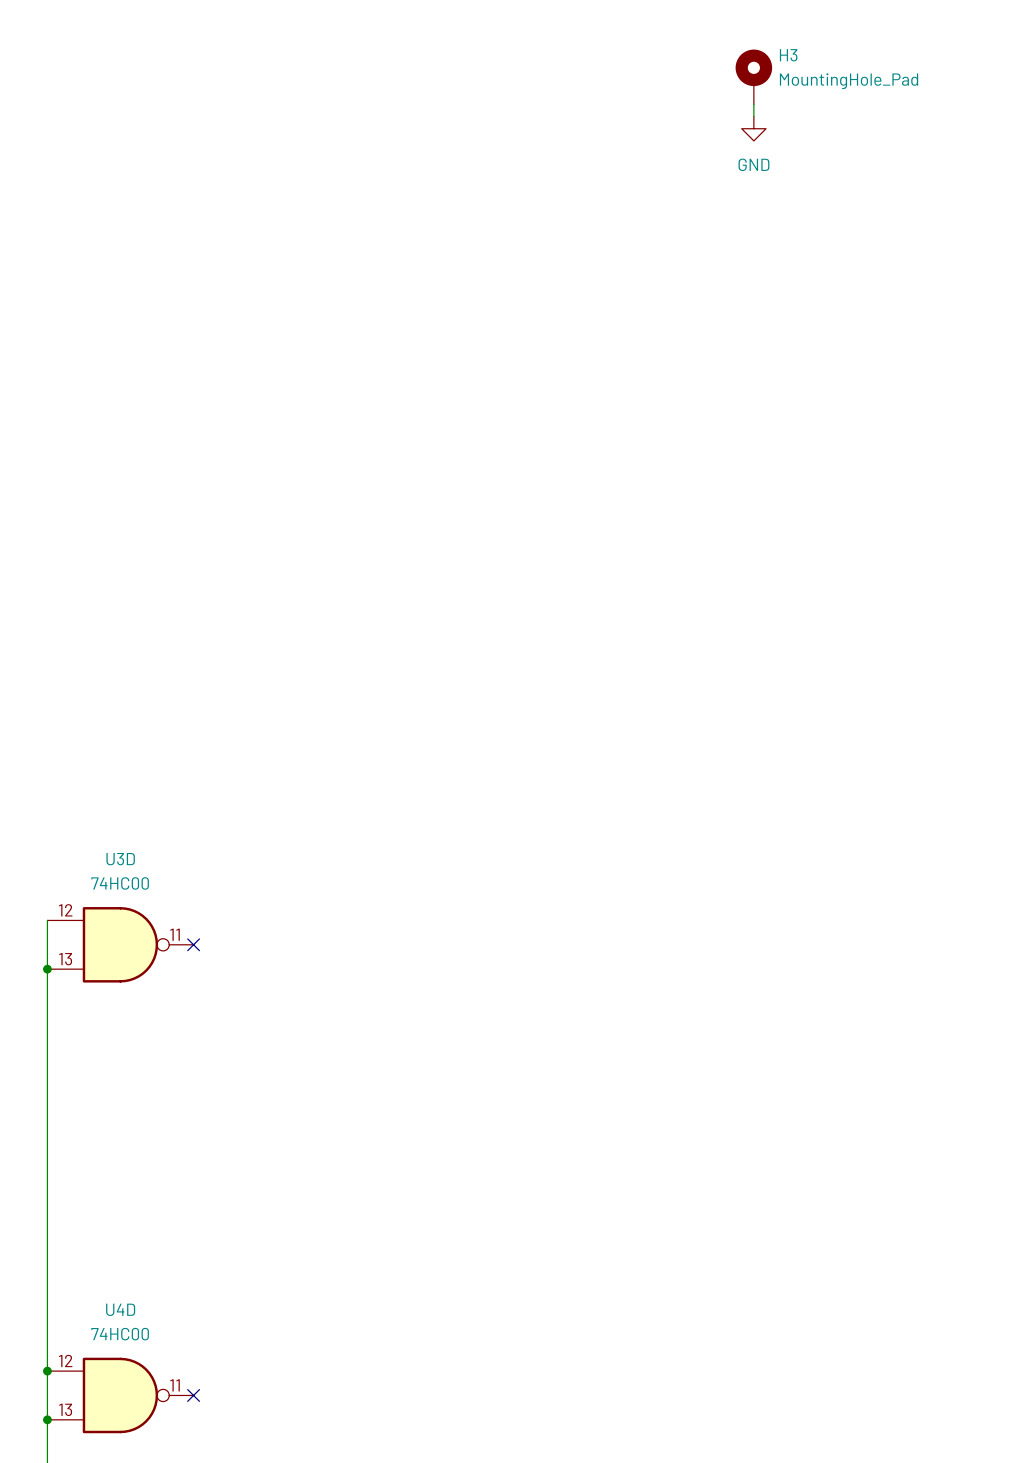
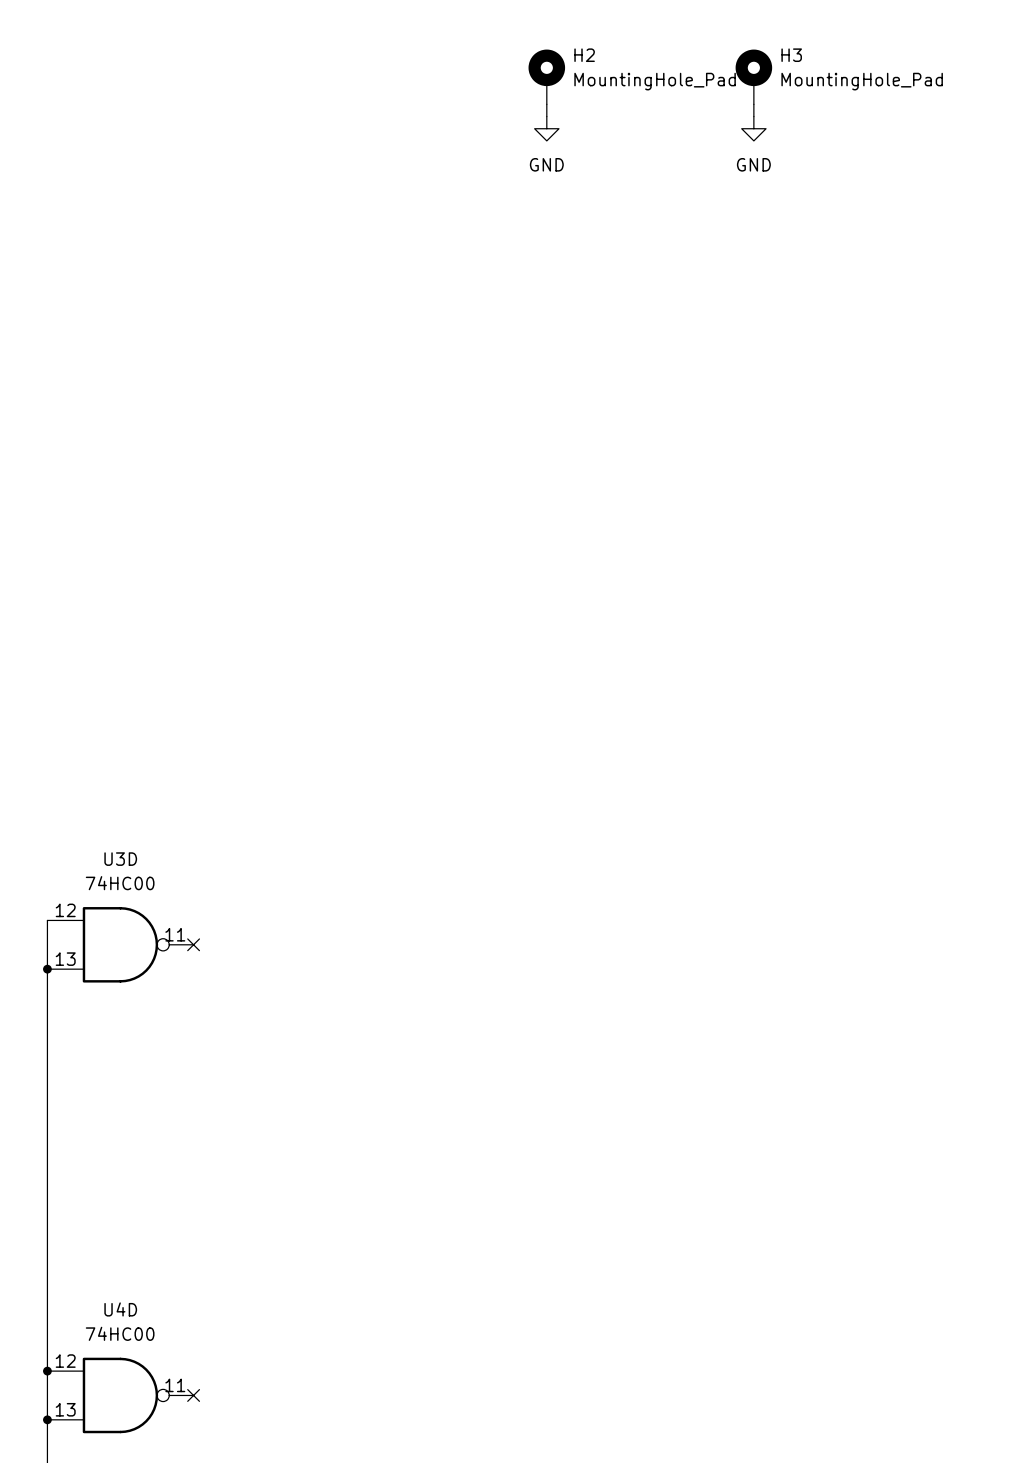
H2: none -> MountingHole_Pad (546, 76)
wire: none -> (546, 104) (546, 116)
power symbol: none -> GND (546, 128)

